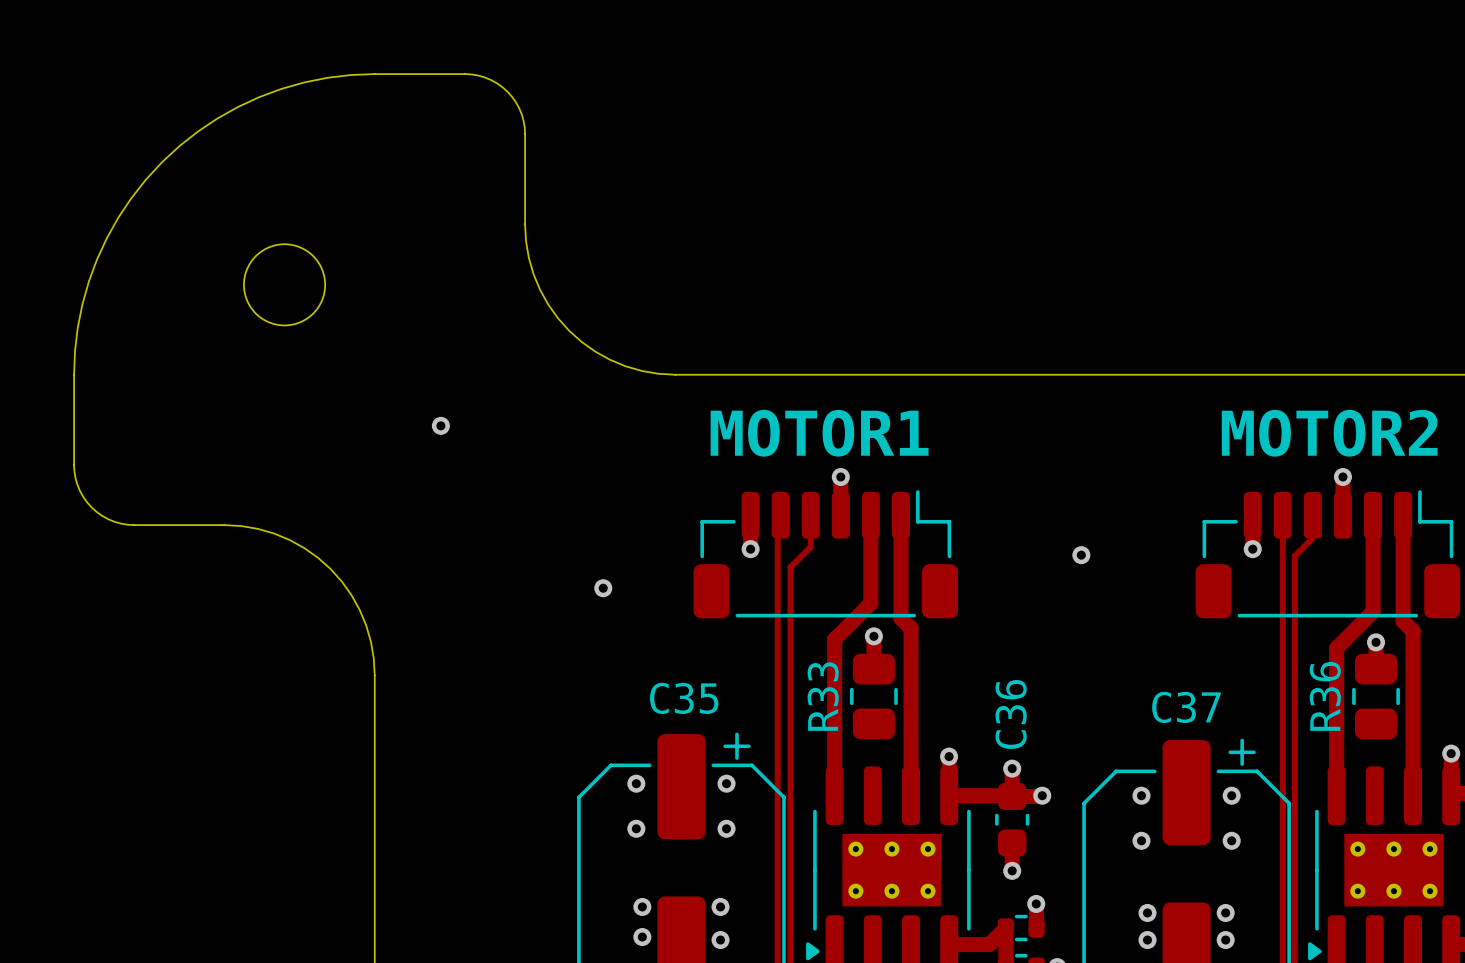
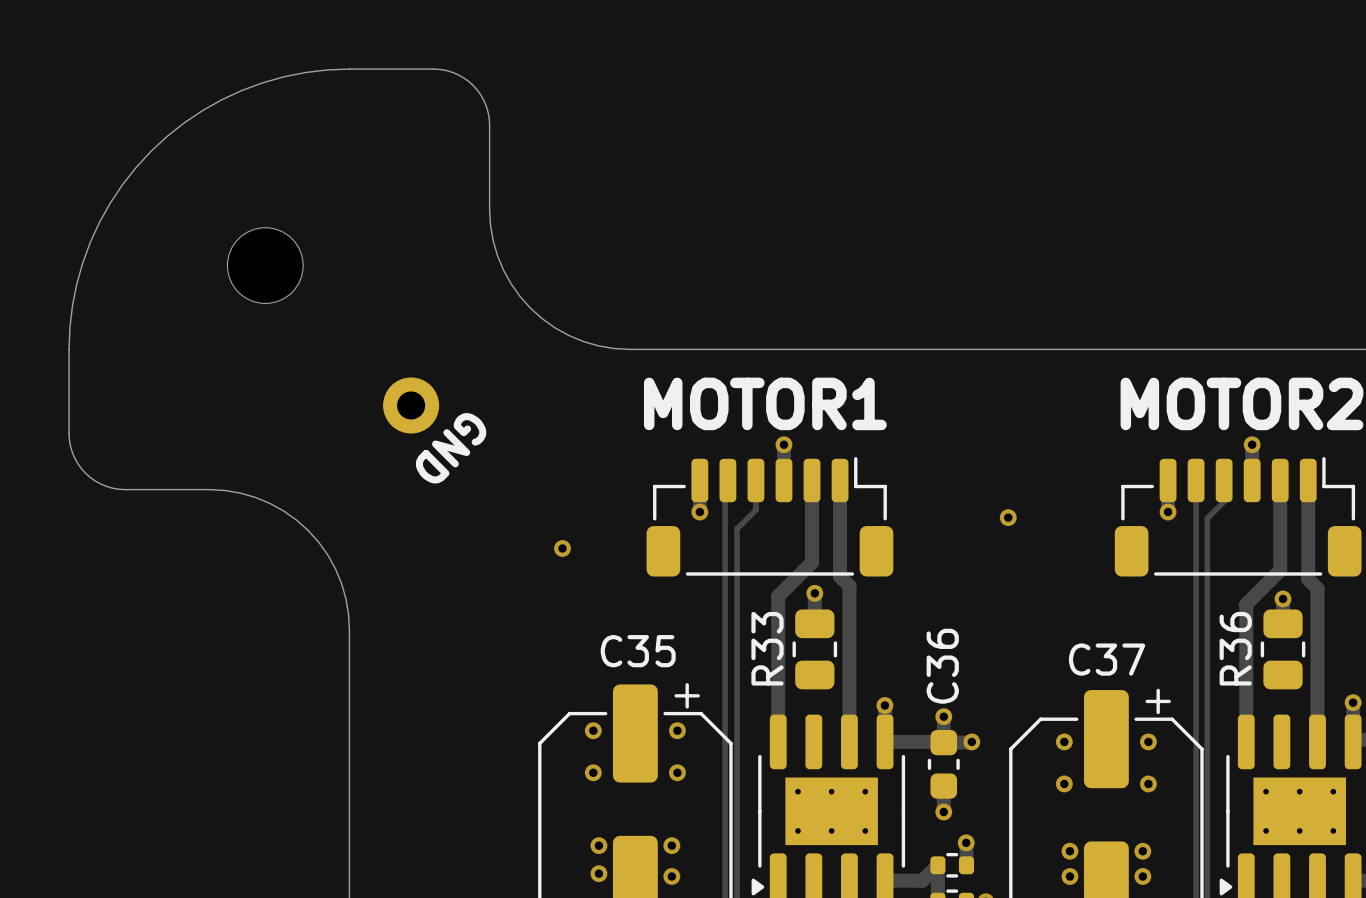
via: (440, 425) -> none
part: none -> (411, 405)
text: none -> GND (451, 448)

